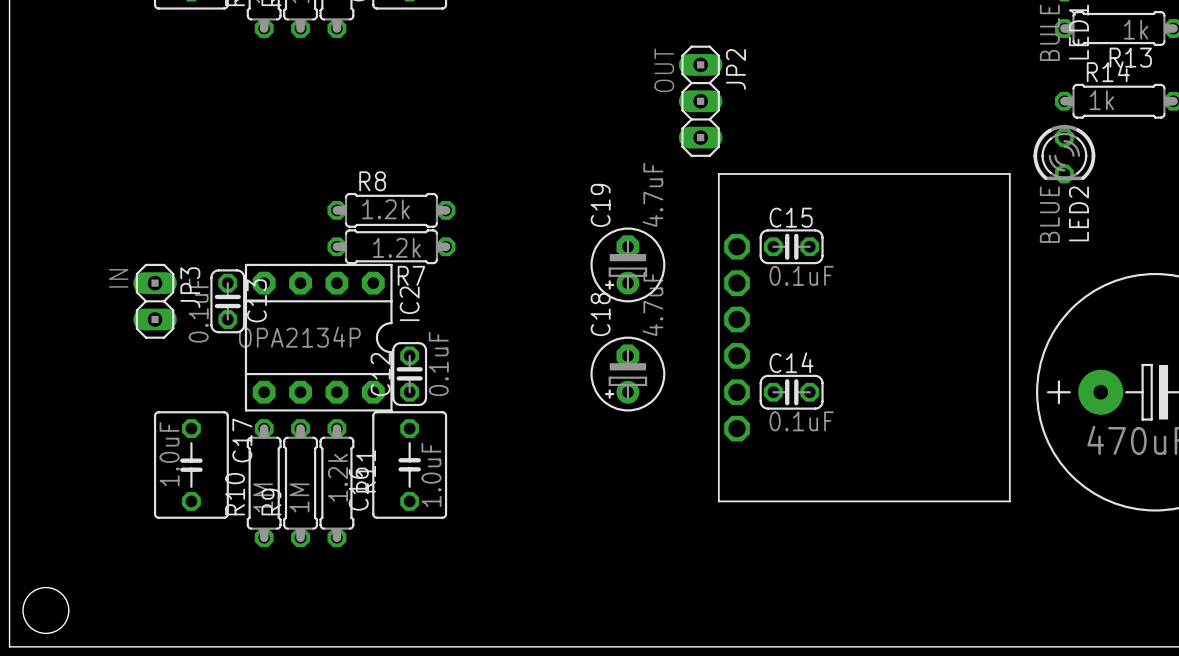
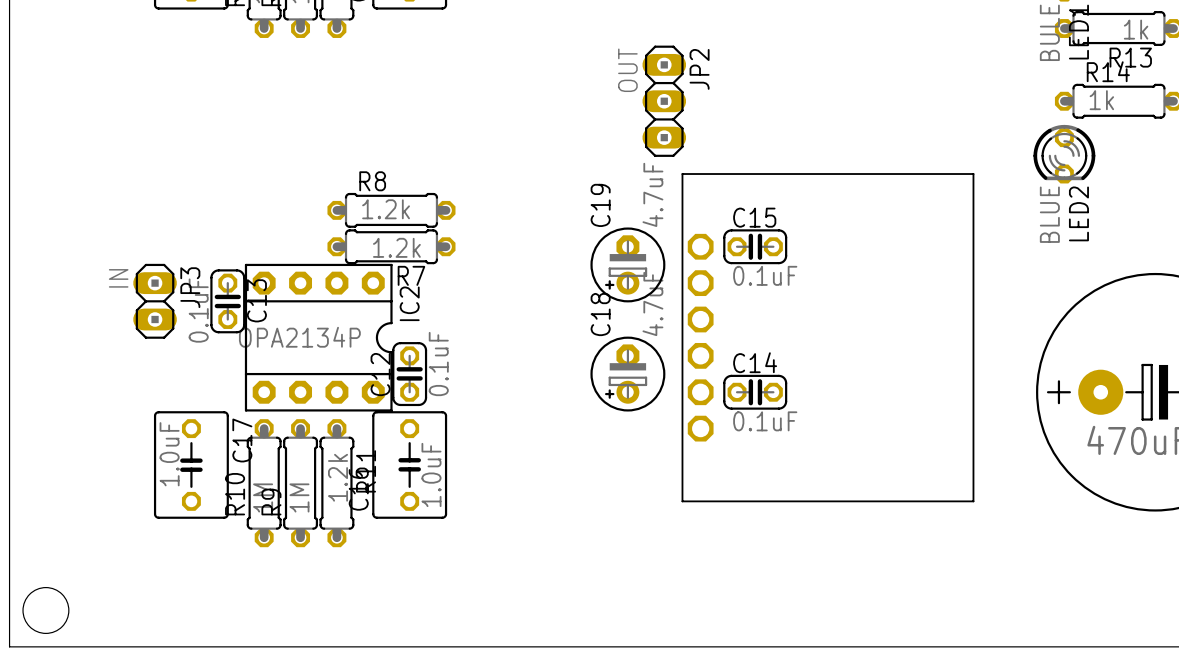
JP2 position: (700, 101) -> (664, 101)
C15 position: (791, 246) -> (755, 246)
part position: (864, 337) -> (827, 337)
C14 position: (791, 392) -> (755, 392)

